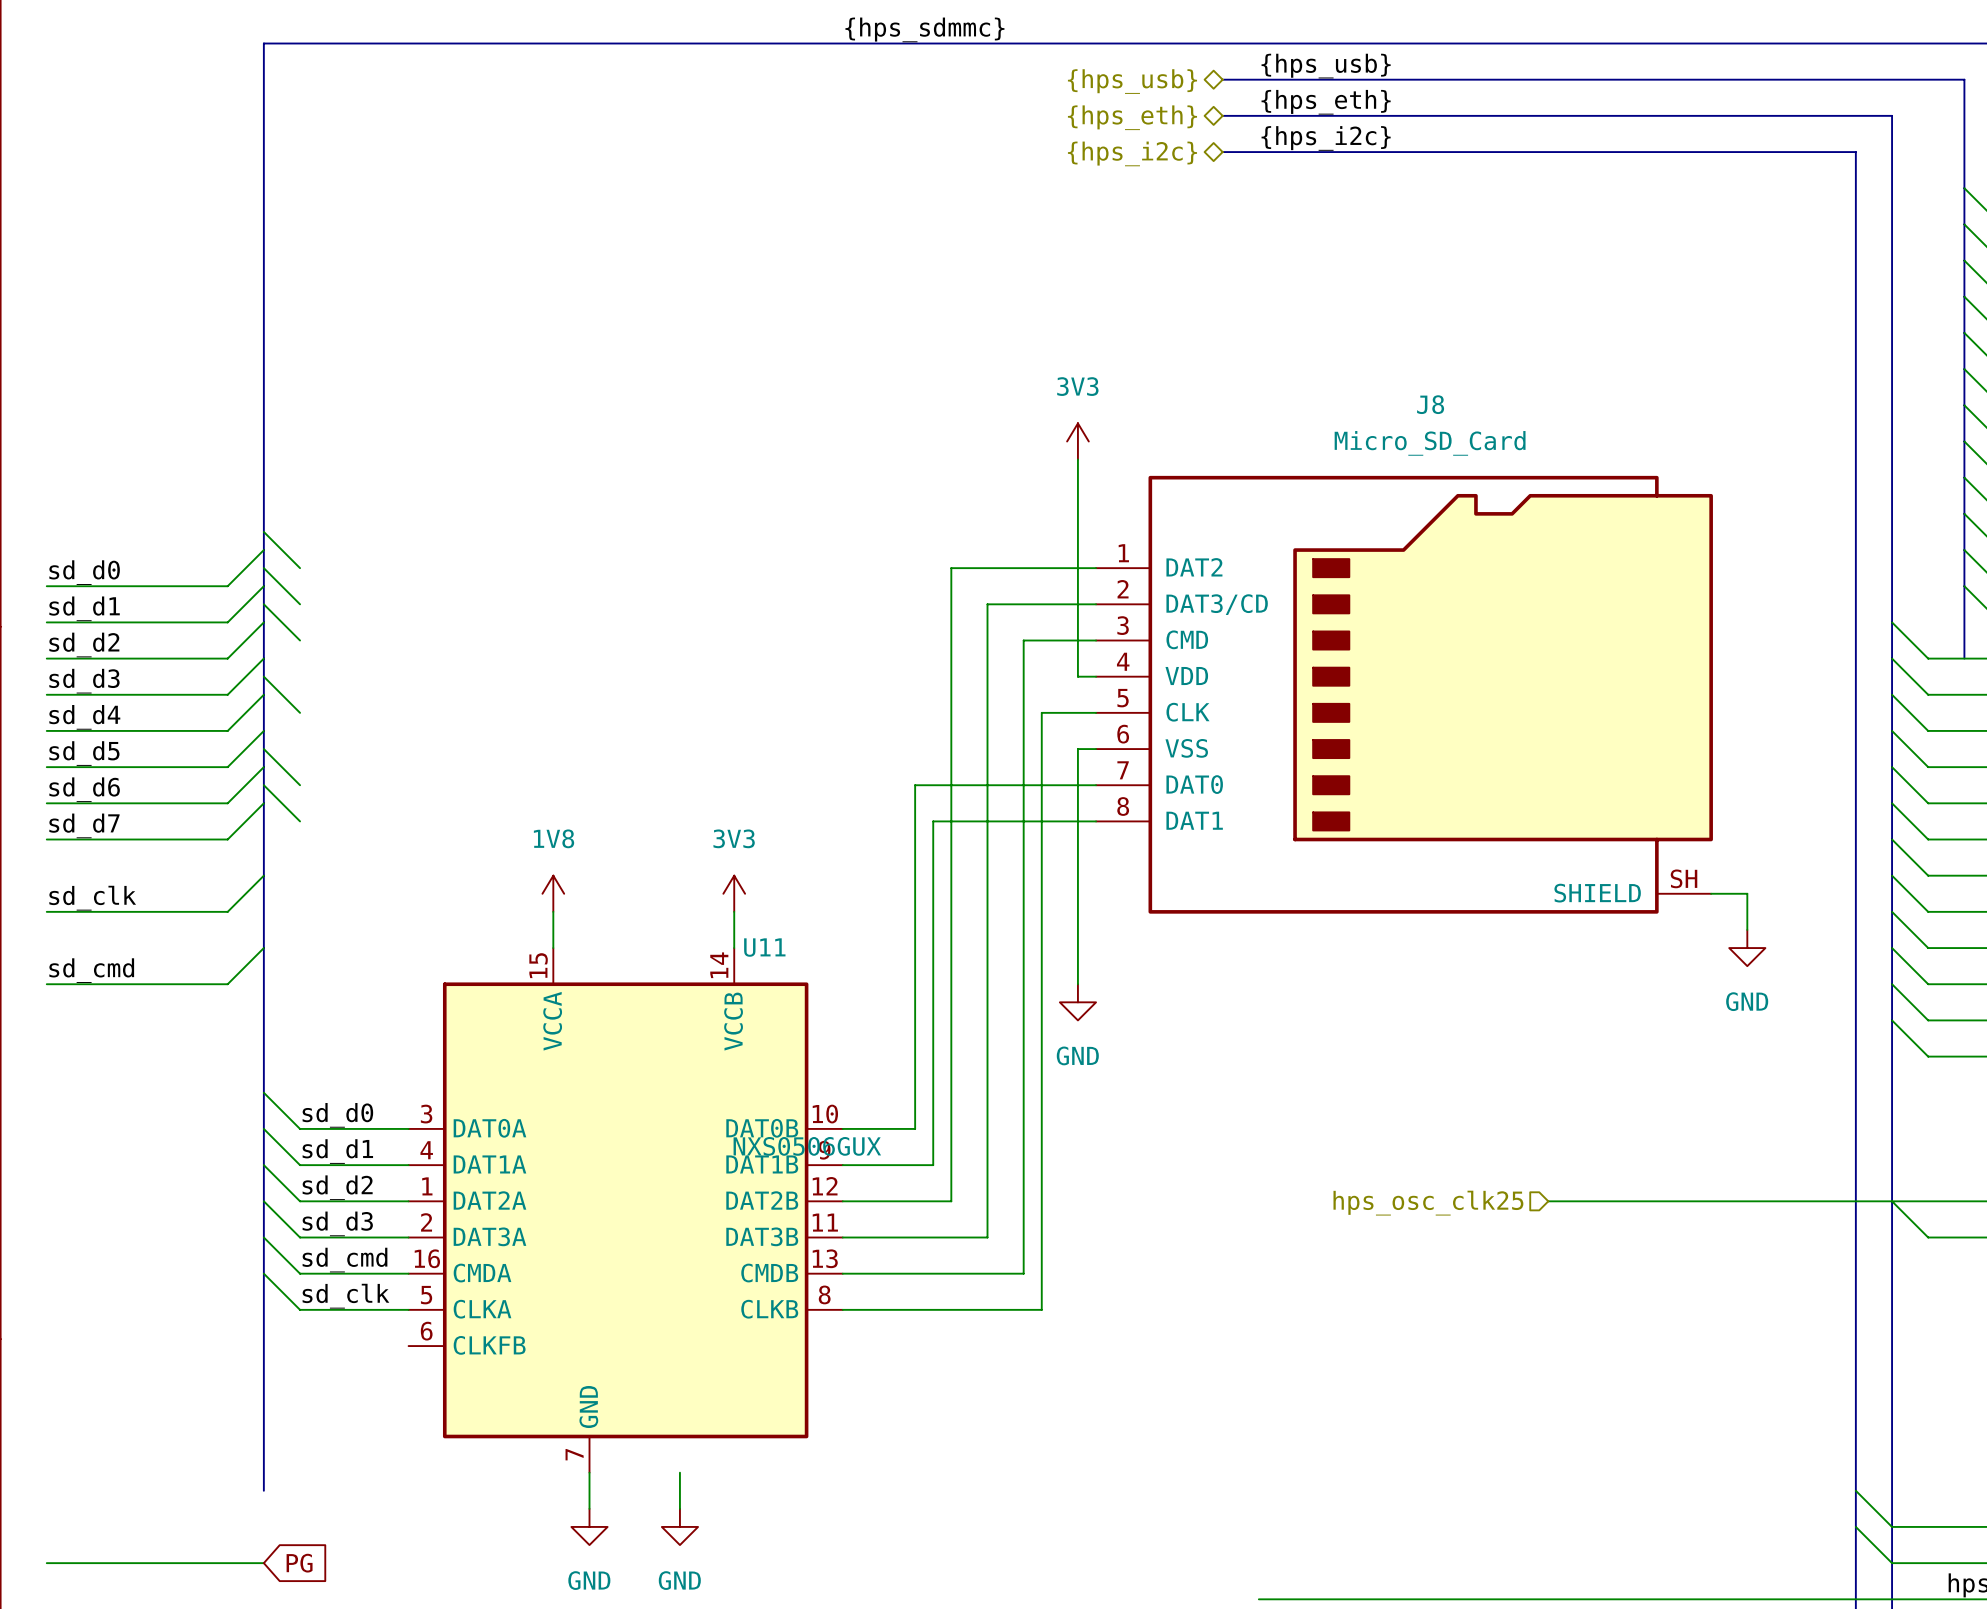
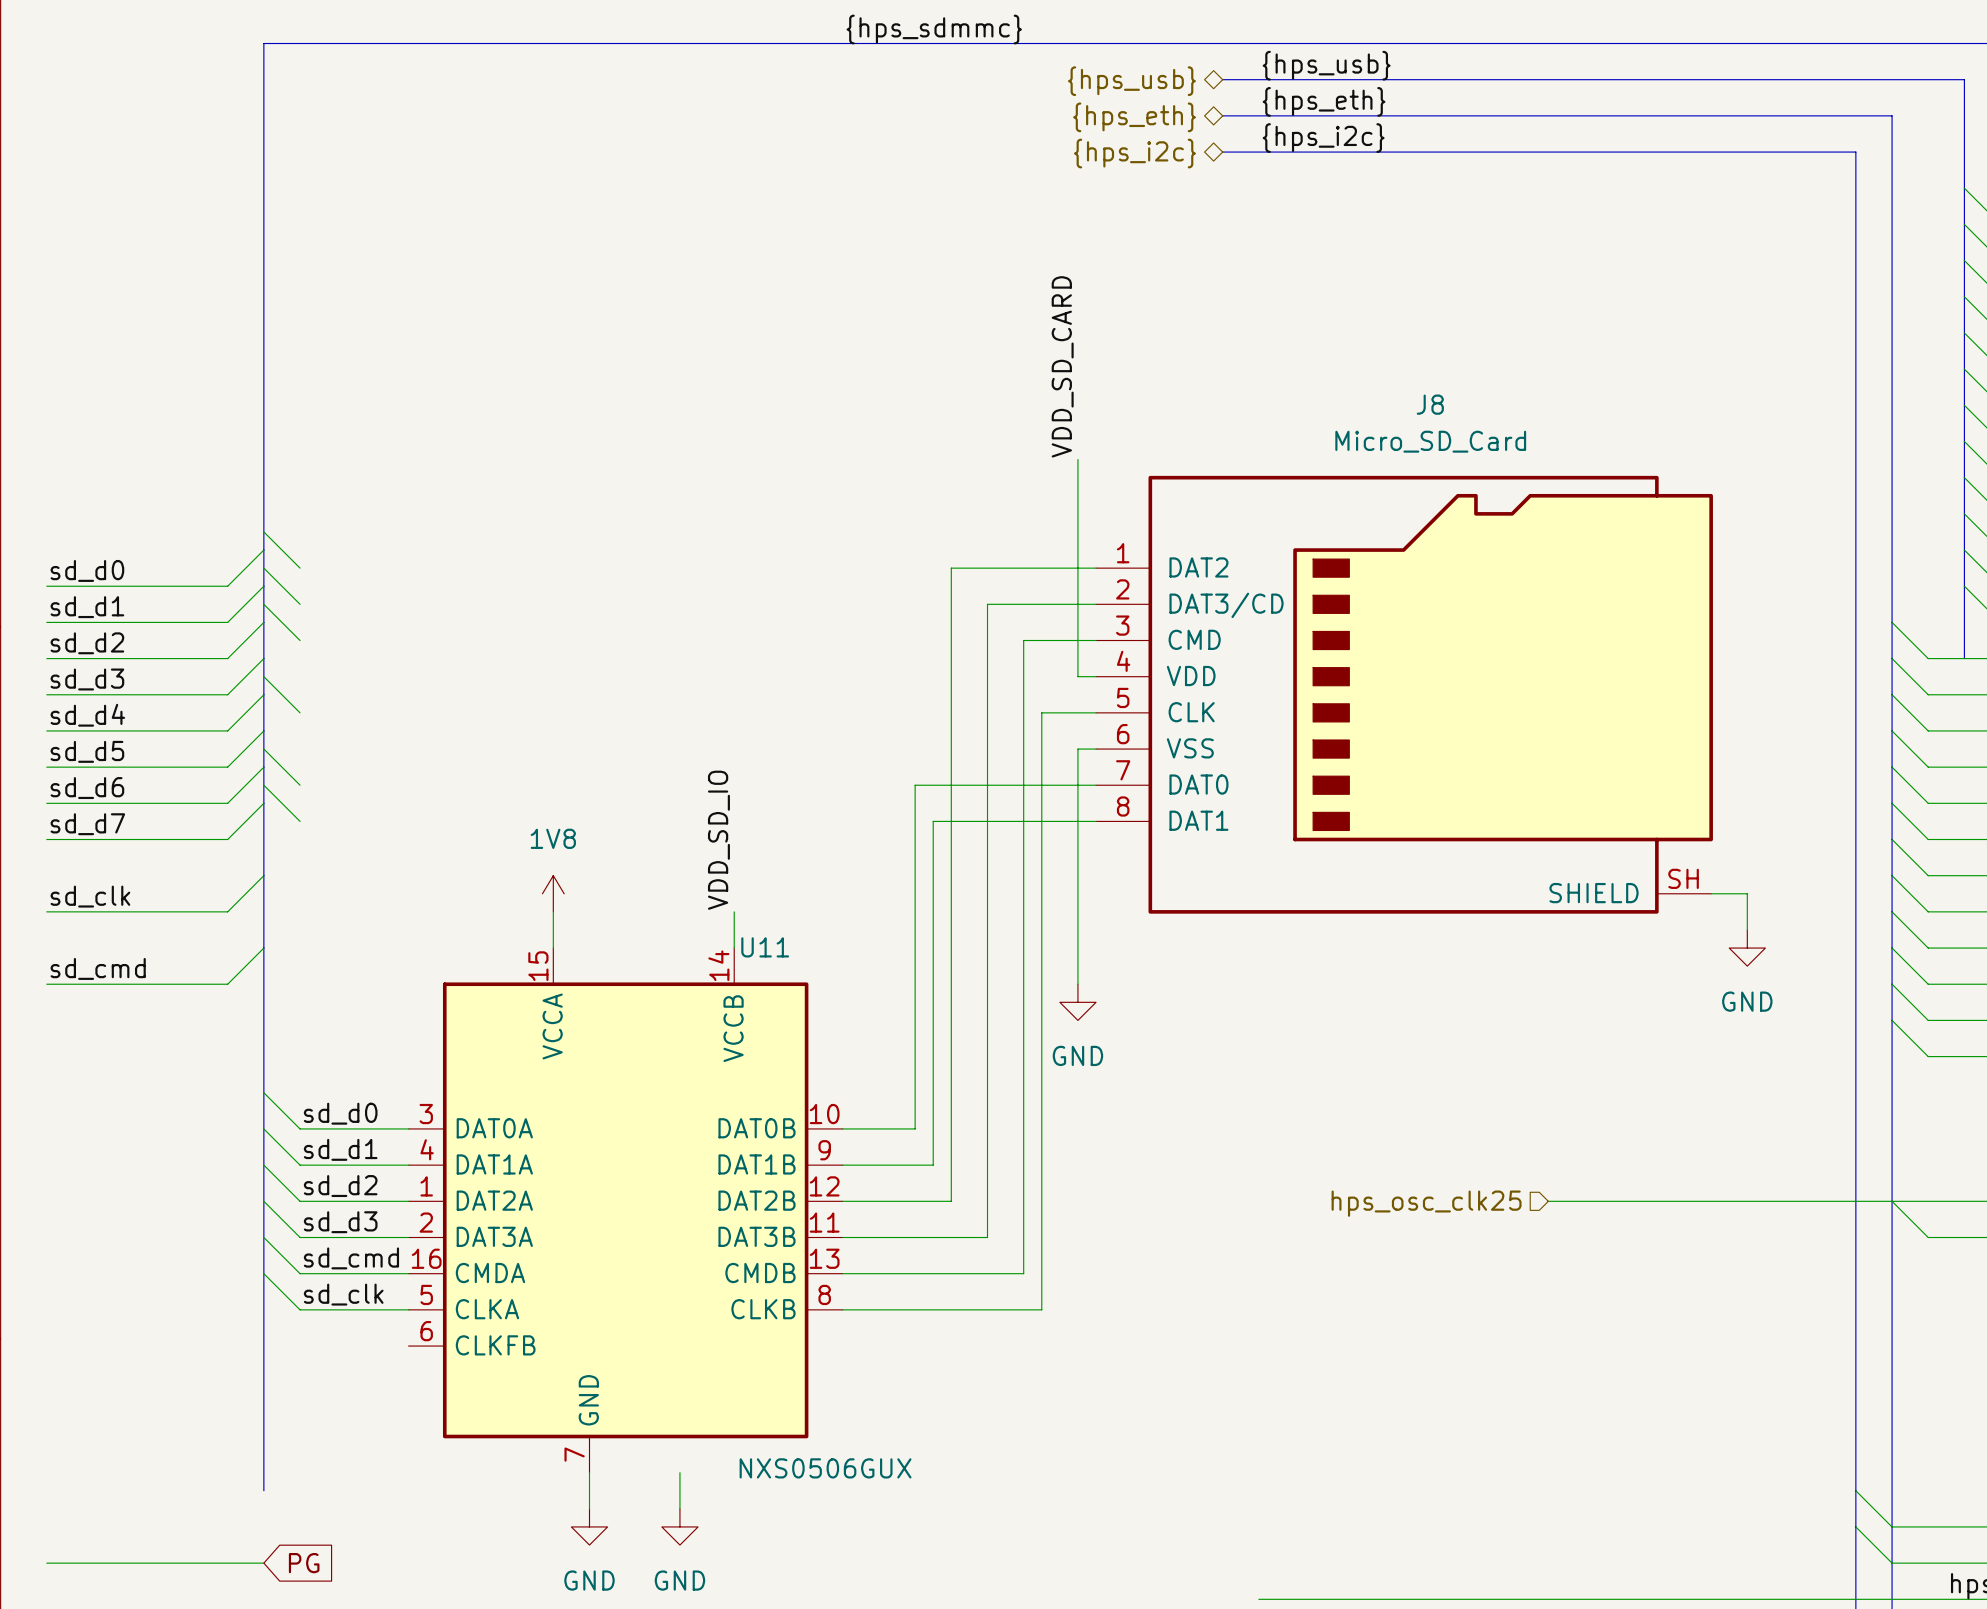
label: none -> VDD_SD_CARD (1062, 366)
power symbol: 3V3 (1077, 441) -> none
label: none -> VDD_SD_IO (718, 840)
power symbol: 3V3 (734, 893) -> none
U11 value position: NXS0506GUX (807, 1146) -> NXS0506GUX (825, 1468)

